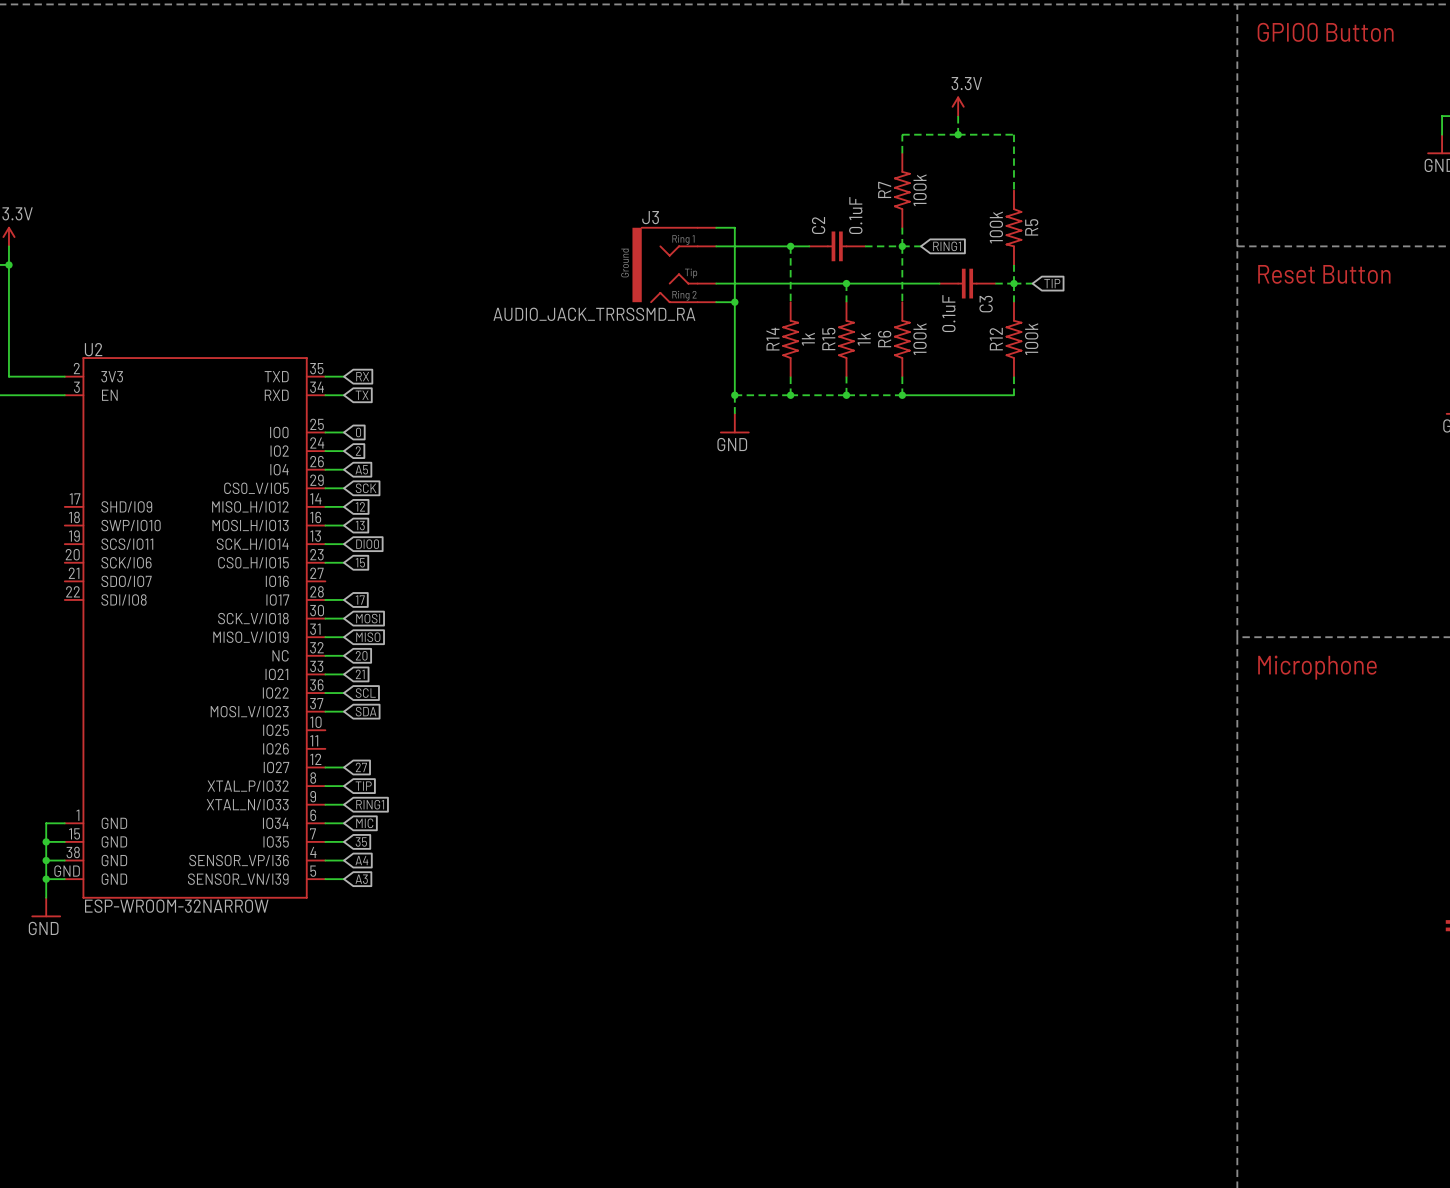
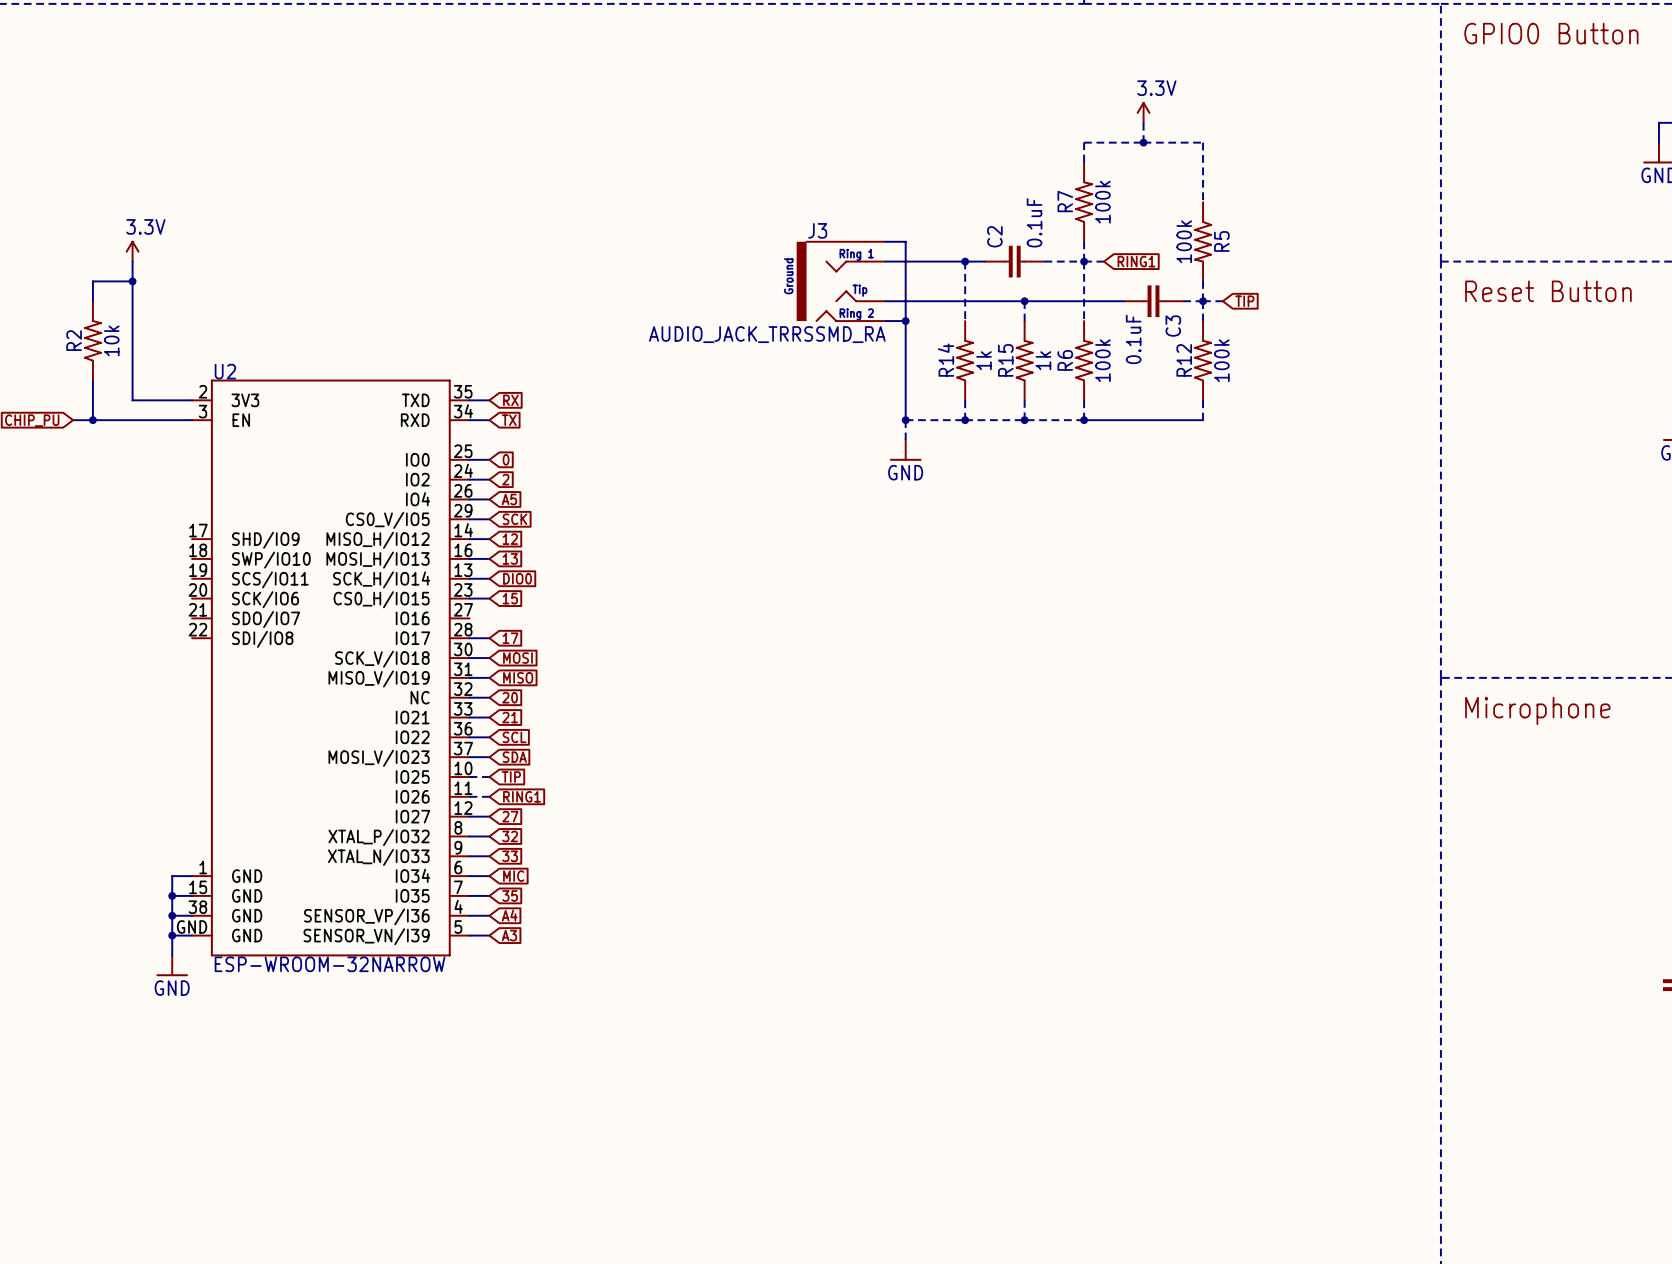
wire: none -> (469, 776) (489, 776)
global label: none -> TIP (511, 776)
wire: none -> (469, 796) (489, 796)
global label: none -> RING1 (521, 796)
global label: TIP (363, 786) -> 32 (510, 836)
global label: RING1 (370, 804) -> 33 (510, 856)

